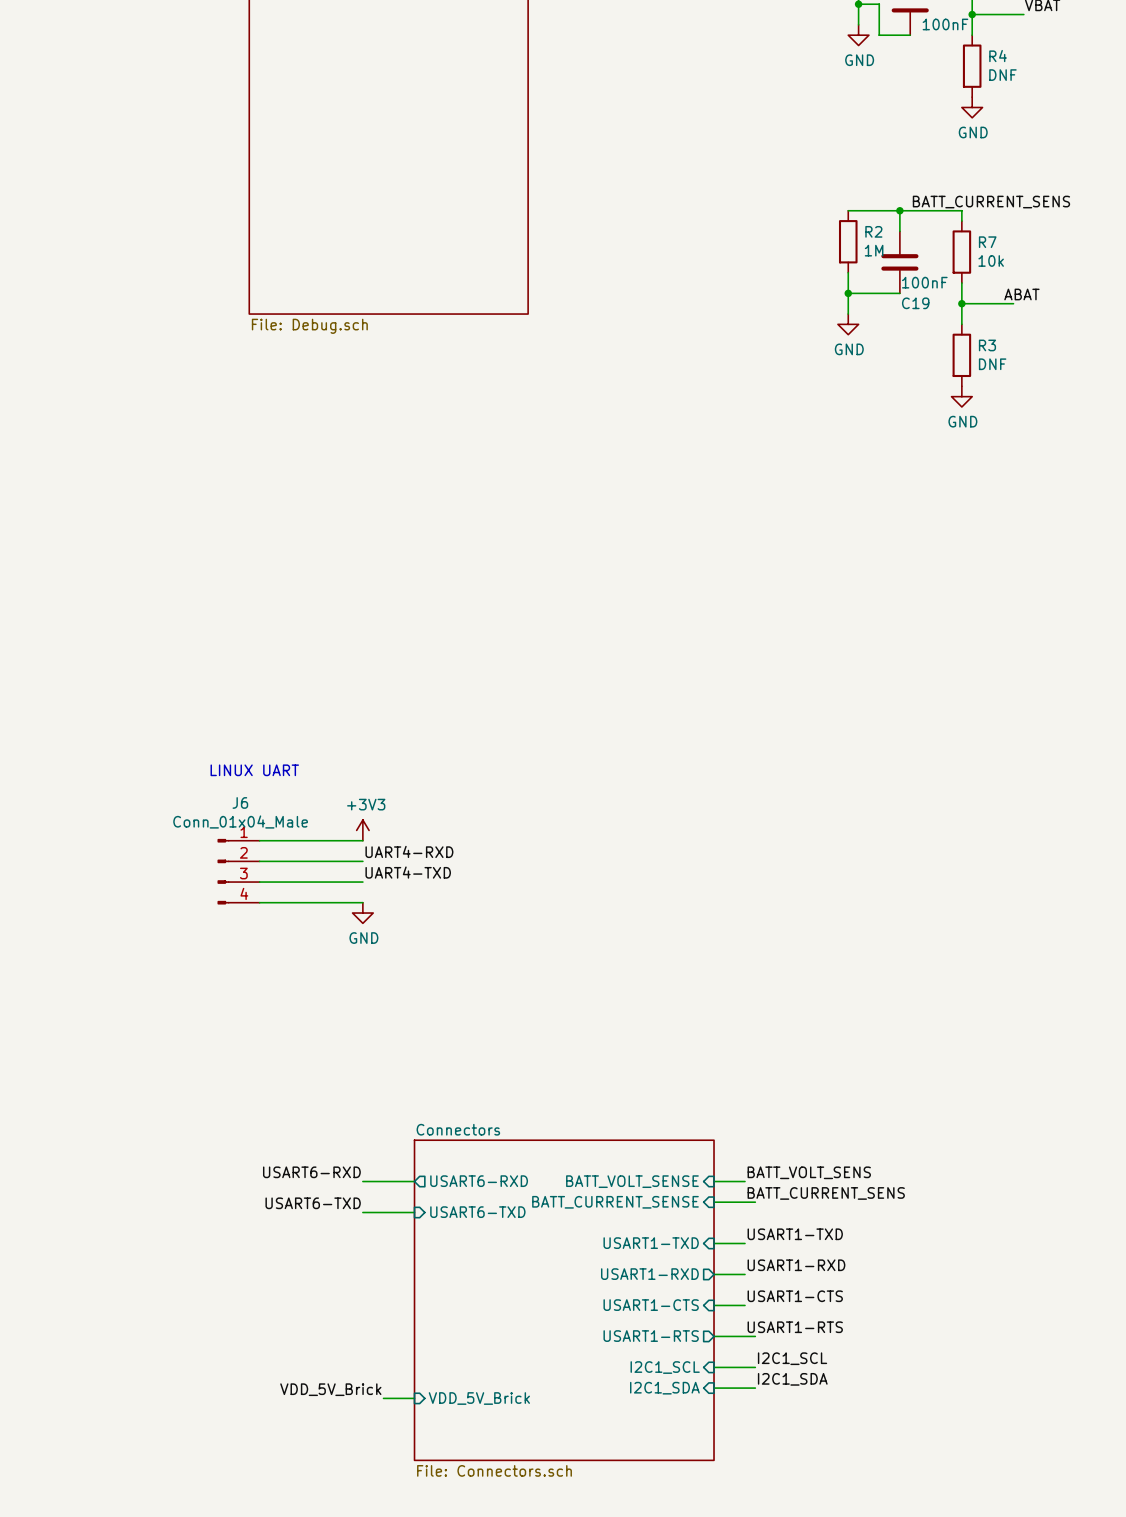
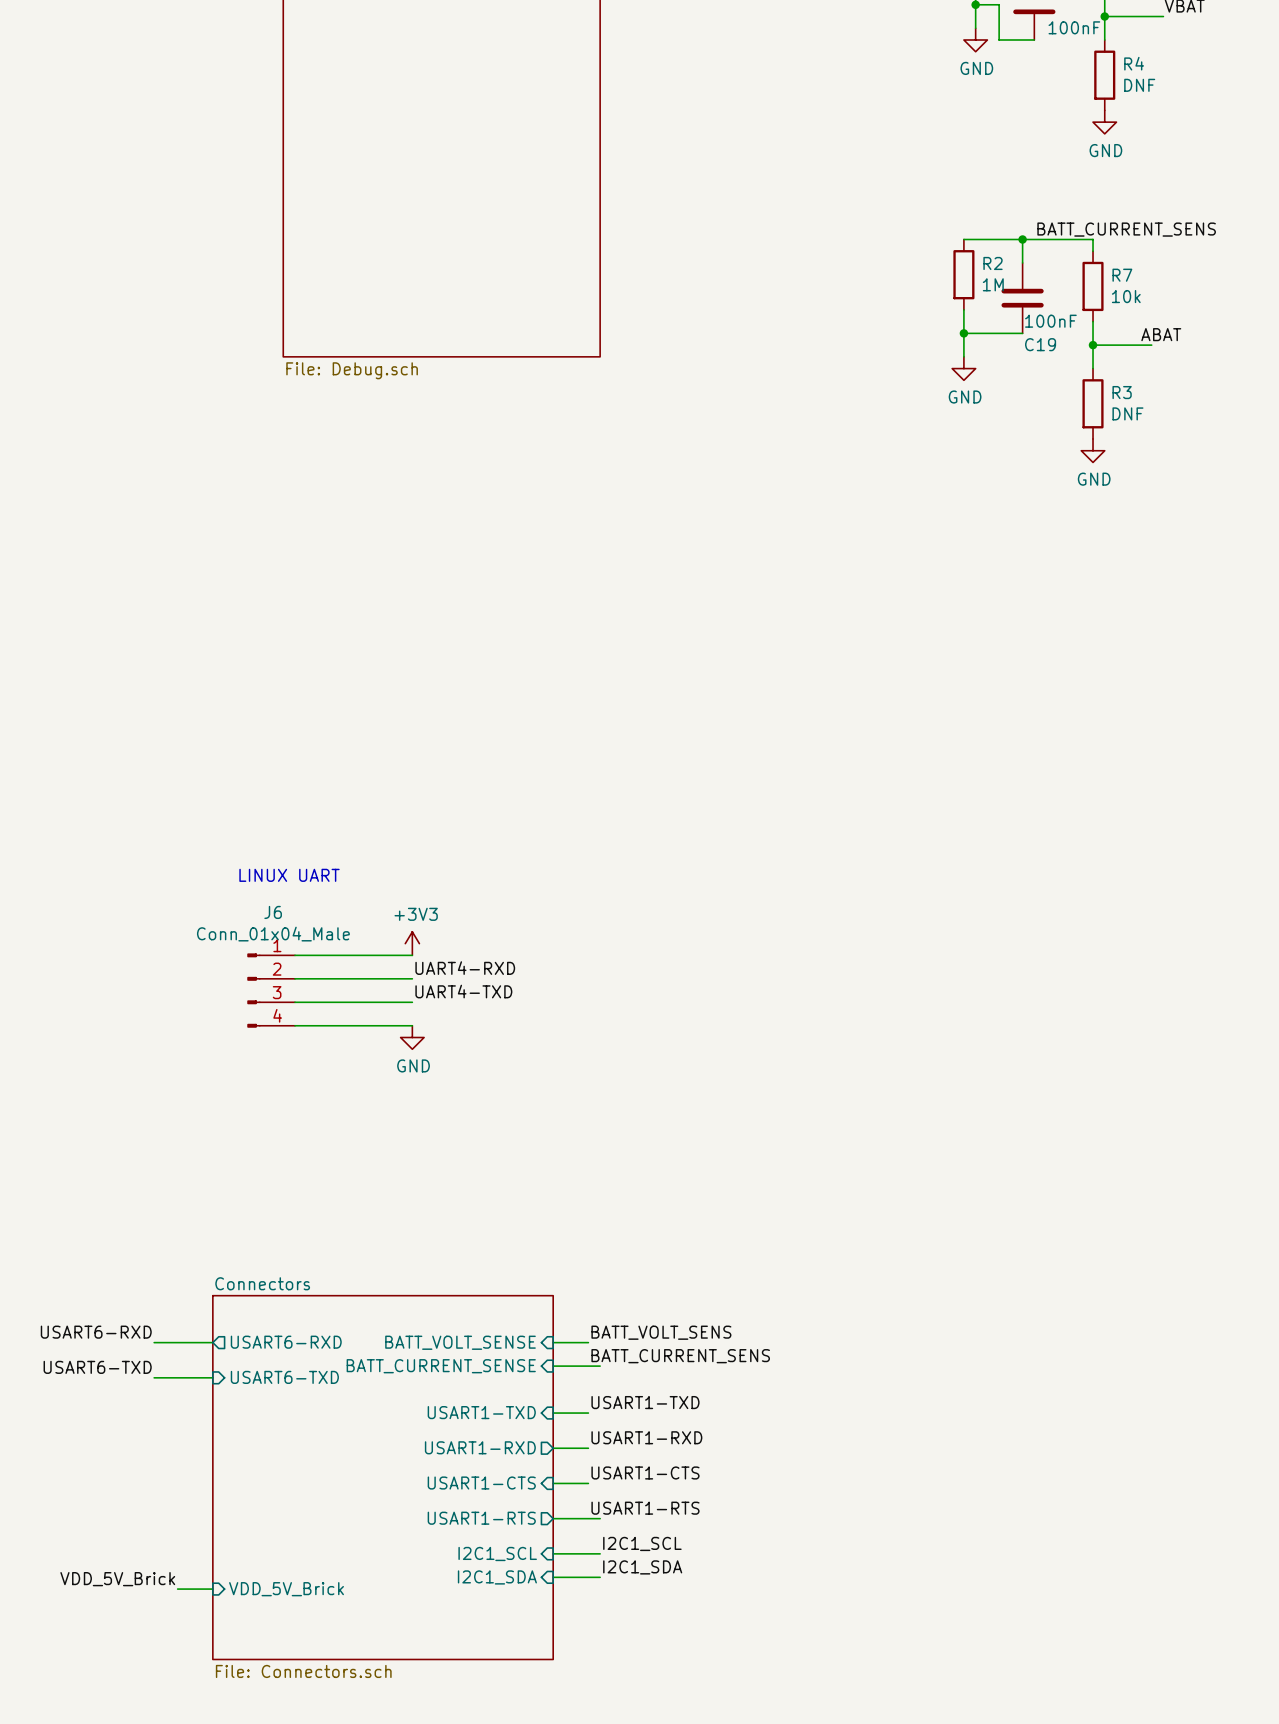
label: none -> USART6-RXD (96, 1332)
label: USART6-RXD (311, 1172) -> none
label: none -> BATT_VOLT_SENS (661, 1332)
label: BATT_VOLT_SENS (809, 1172) -> none
wire: none -> (154, 1342) (212, 1342)
sheet pin: none -> USART6-RXD (286, 1342)
wire: (362, 1181) (414, 1181) -> none
sheet pin: none -> BATT_VOLT_SENSE (460, 1342)
sheet pin: USART6-RXD (479, 1181) -> none
wire: none -> (553, 1342) (588, 1342)
sheet pin: BATT_VOLT_SENSE (632, 1181) -> none
wire: (714, 1181) (744, 1181) -> none
label: none -> BATT_CURRENT_SENS (680, 1356)
label: BATT_CURRENT_SENS (826, 1193) -> none
sheet pin: none -> BATT_CURRENT_SENSE (441, 1366)
wire: none -> (553, 1366) (600, 1366)
sheet pin: BATT_CURRENT_SENSE (615, 1202) -> none
wire: (714, 1202) (755, 1202) -> none
label: none -> USART6-TXD (97, 1367)
label: USART6-TXD (313, 1203) -> none
wire: none -> (154, 1377) (212, 1377)
sheet pin: none -> USART6-TXD (284, 1377)
wire: (362, 1212) (414, 1212) -> none
sheet pin: USART6-TXD (477, 1212) -> none
label: none -> USART1-TXD (645, 1402)
label: USART1-TXD (795, 1234) -> none
sheet pin: none -> USART1-TXD (481, 1412)
wire: none -> (553, 1413) (588, 1413)
sheet pin: USART1-TXD (651, 1243) -> none
wire: (714, 1243) (744, 1243) -> none
label: none -> USART1-RXD (646, 1437)
label: USART1-RXD (796, 1265) -> none
sheet pin: none -> USART1-RXD (480, 1447)
wire: none -> (553, 1448) (588, 1448)
sheet pin: USART1-RXD (649, 1274) -> none
wire: (714, 1274) (744, 1274) -> none
label: none -> USART1-CTS (645, 1472)
label: USART1-CTS (795, 1296) -> none
sheet Connectors: none -> File: Connectors.sch (383, 1477)
sheet Connectors: File: Connectors.sch (564, 1300) -> none
sheet pin: none -> USART1-CTS (481, 1483)
sheet pin: USART1-CTS (651, 1305) -> none
wire: (714, 1305) (744, 1305) -> none
label: none -> USART1-RTS (645, 1508)
label: USART1-RTS (795, 1327) -> none
sheet pin: none -> USART1-RTS (481, 1518)
wire: none -> (553, 1518) (600, 1518)
sheet pin: USART1-RTS (651, 1336) -> none
wire: (714, 1336) (755, 1336) -> none
label: none -> I2C1_SCL (642, 1543)
label: I2C1_SCL (792, 1358) -> none
sheet pin: none -> I2C1_SCL (497, 1553)
wire: none -> (553, 1553) (600, 1553)
sheet pin: I2C1_SCL (665, 1367) -> none
wire: (714, 1367) (755, 1367) -> none
label: none -> I2C1_SDA (642, 1567)
label: I2C1_SDA (792, 1379) -> none
sheet pin: none -> I2C1_SDA (497, 1577)
wire: none -> (553, 1577) (600, 1577)
sheet pin: I2C1_SDA (664, 1388) -> none
wire: (714, 1388) (755, 1388) -> none
label: none -> VDD_5V_Brick (117, 1579)
label: VDD_5V_Brick (330, 1389) -> none
wire: none -> (177, 1589) (212, 1589)
sheet pin: none -> VDD_5V_Brick (286, 1589)
wire: (383, 1398) (414, 1398) -> (553, 1483) (588, 1483)
sheet pin: VDD_5V_Brick (479, 1398) -> none

